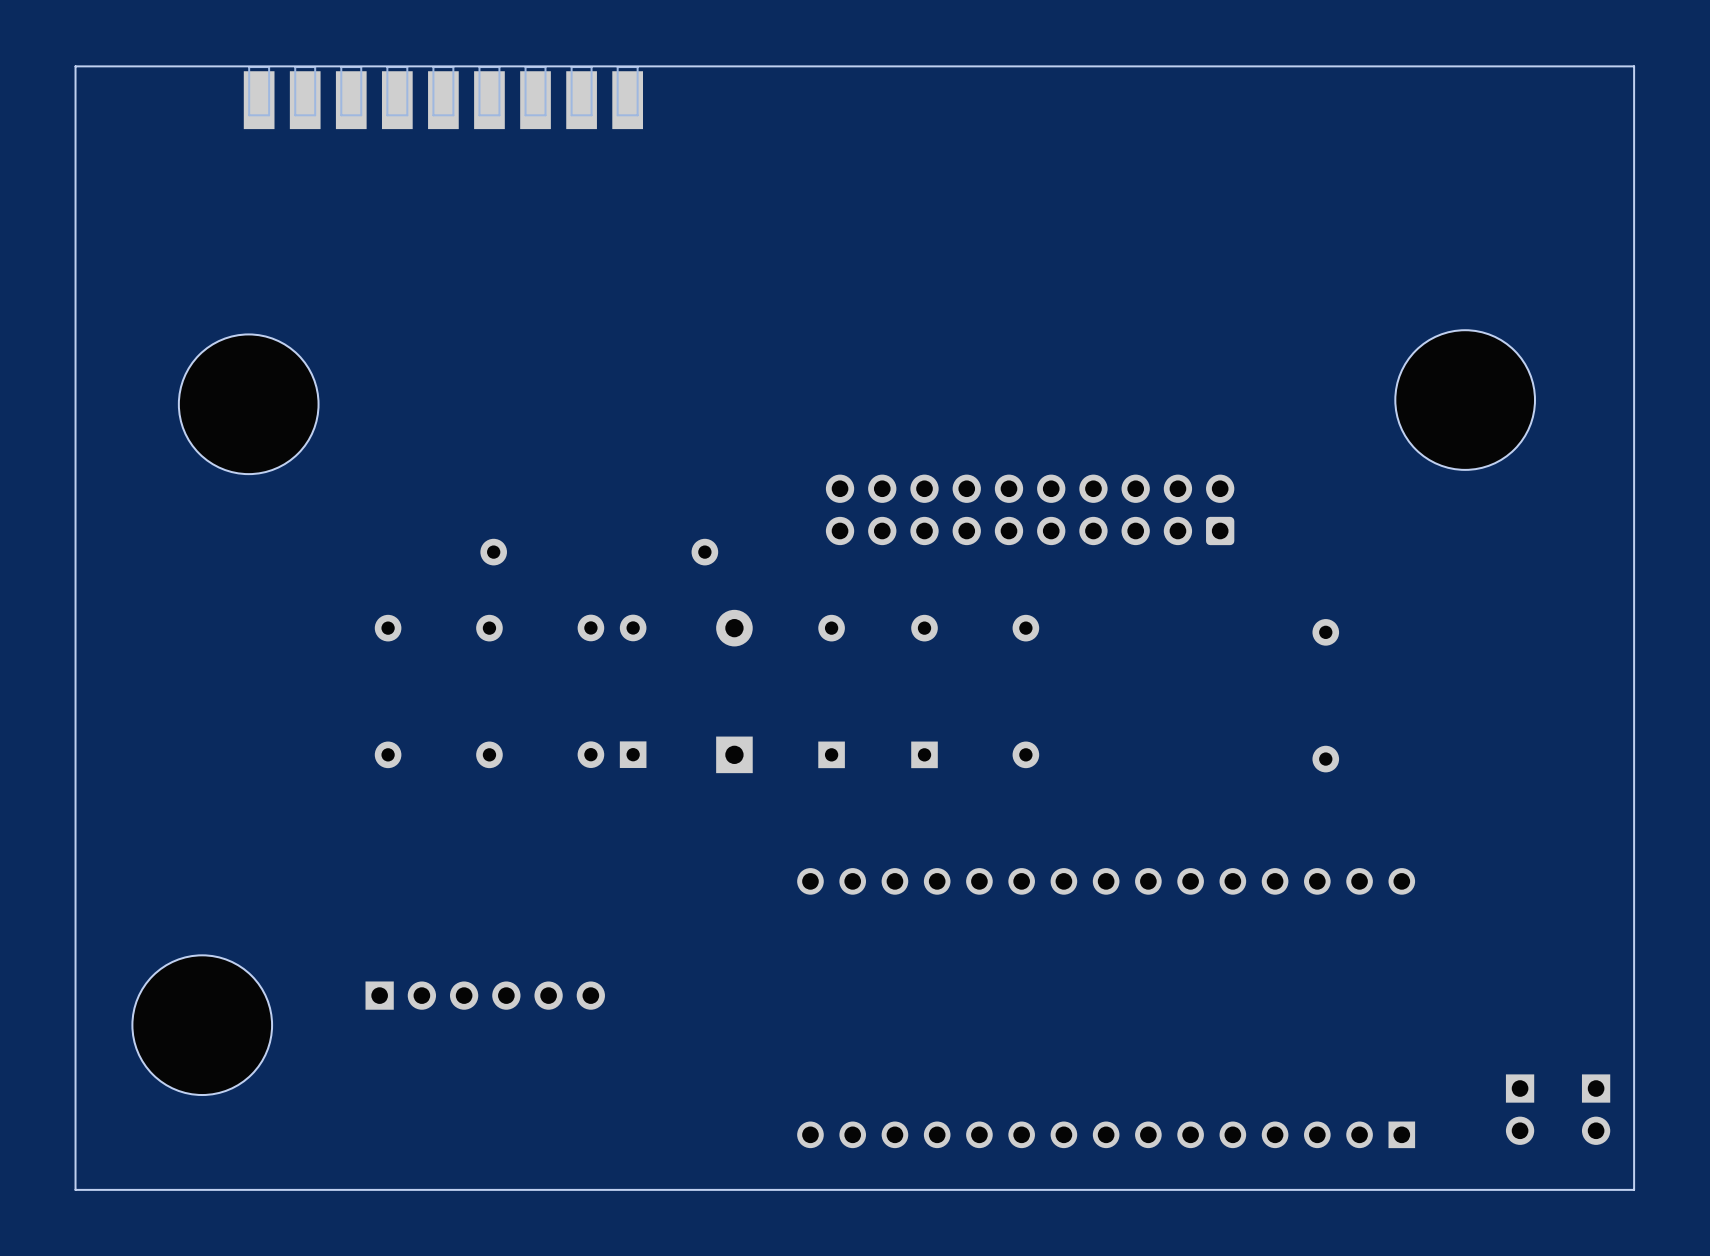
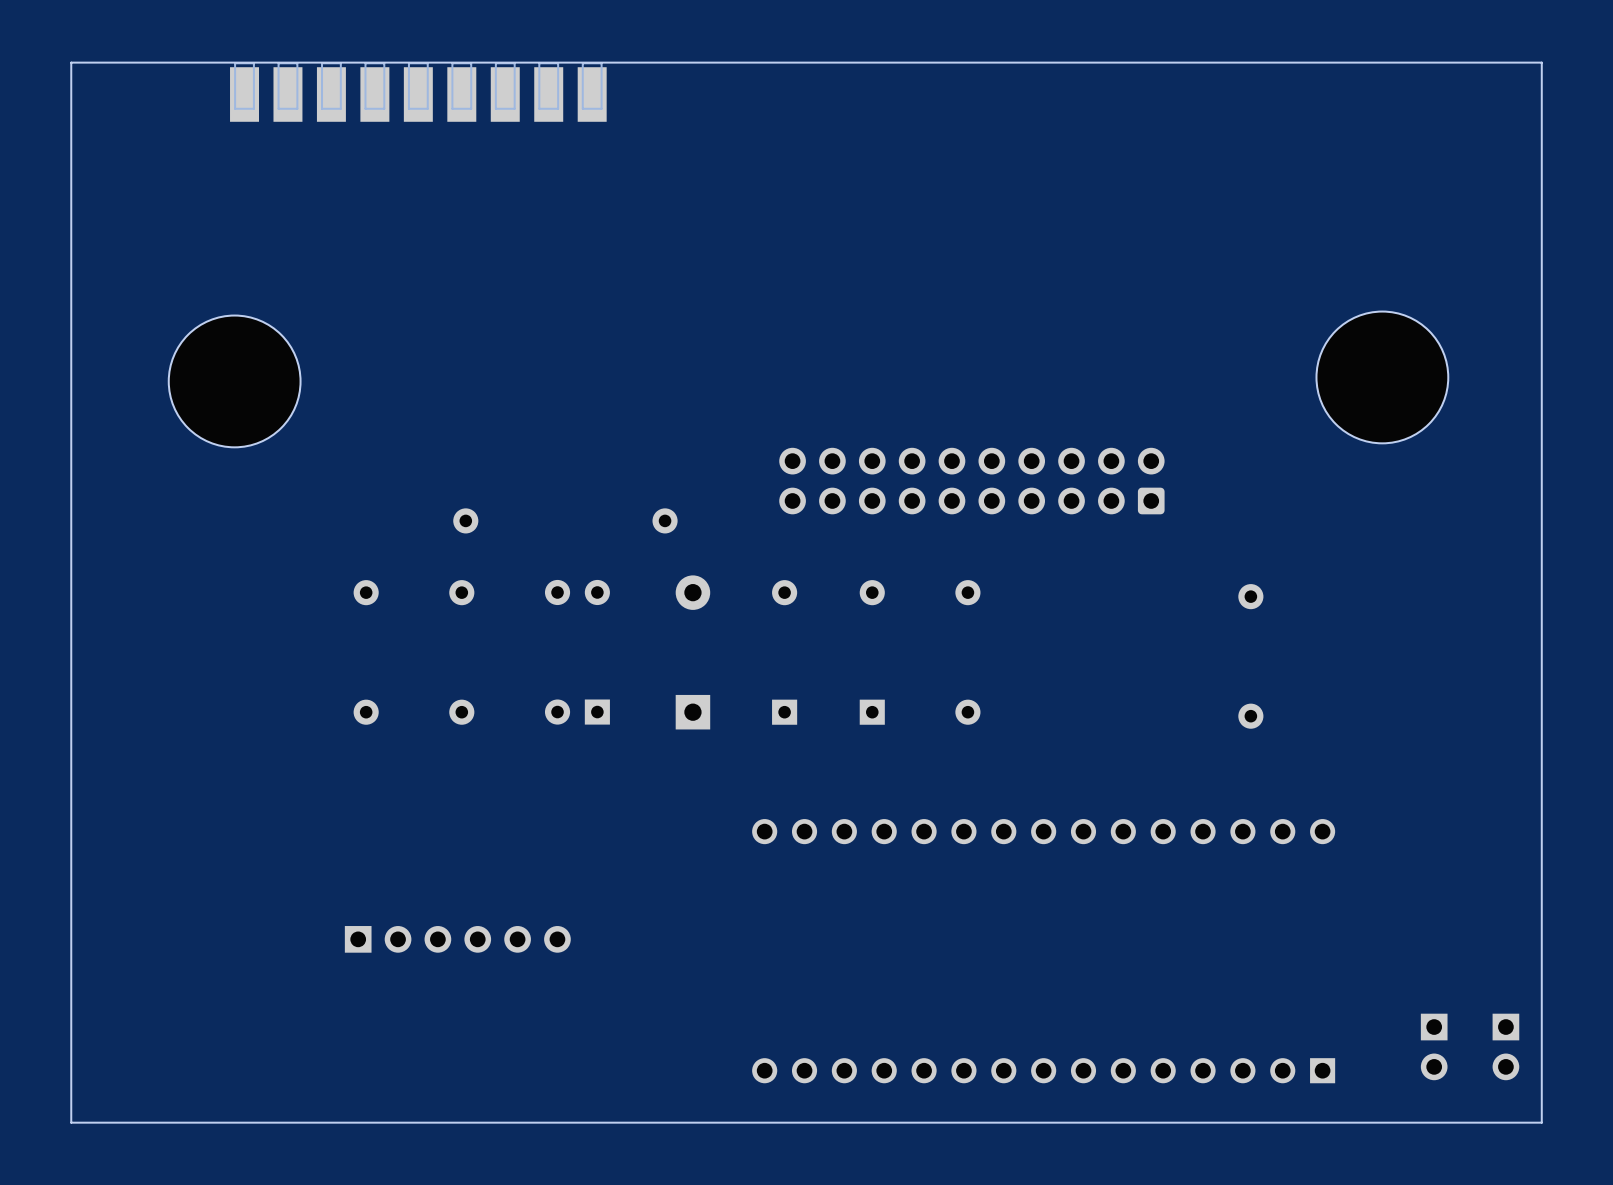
part: (202, 1025) -> none

